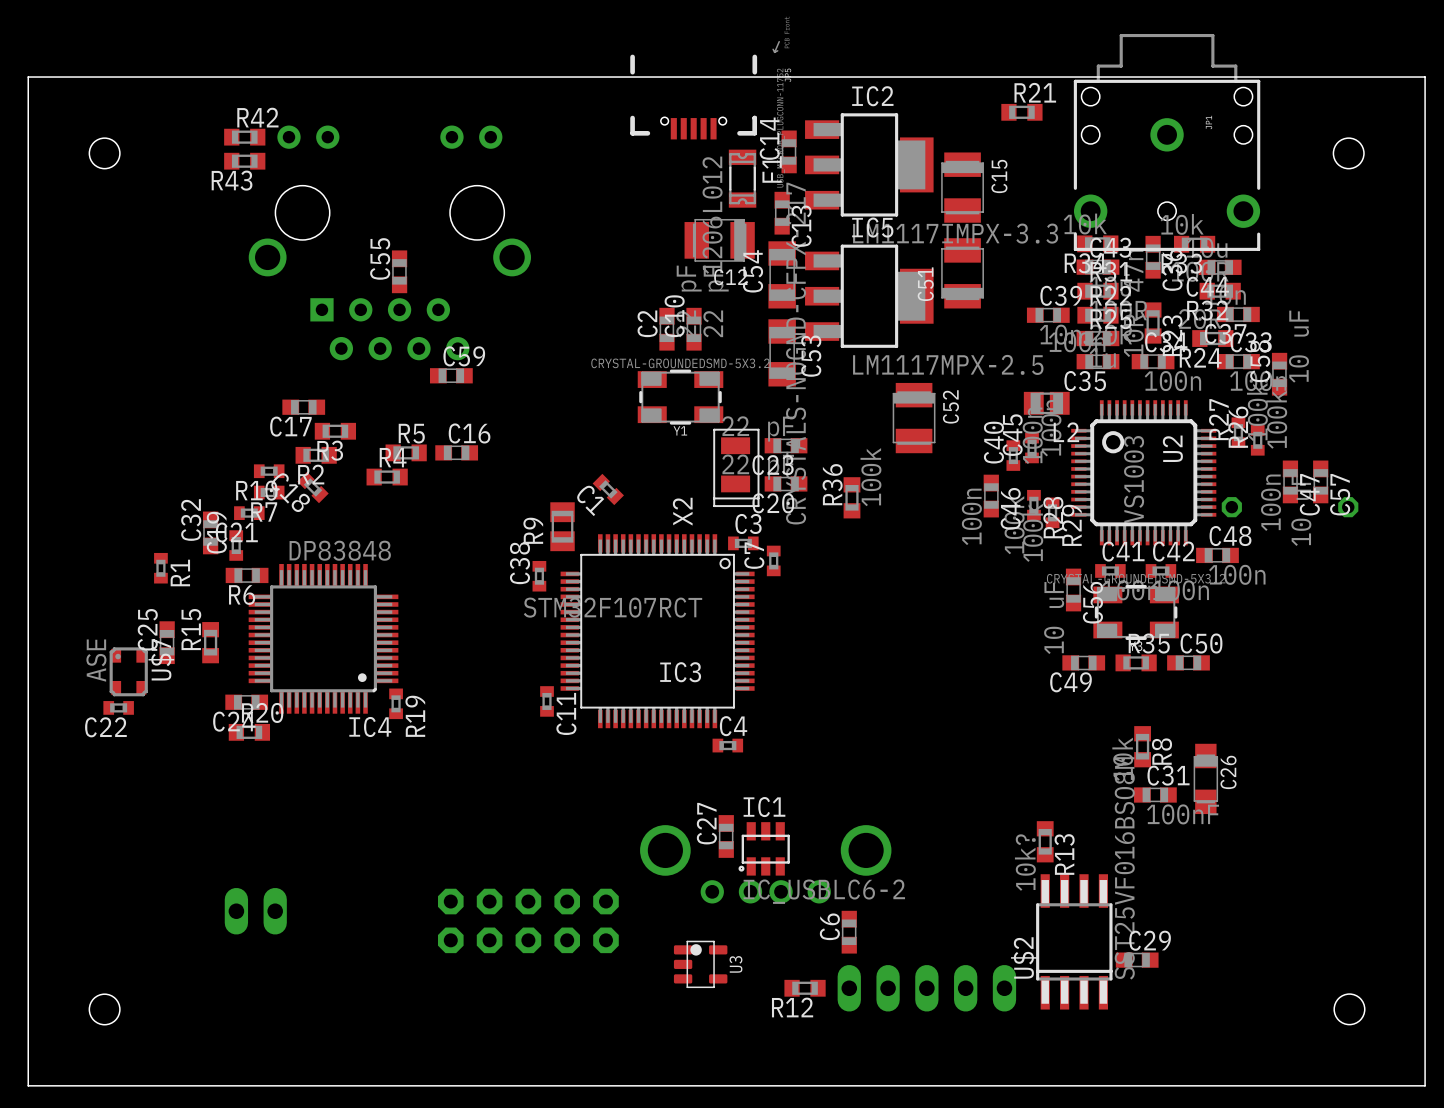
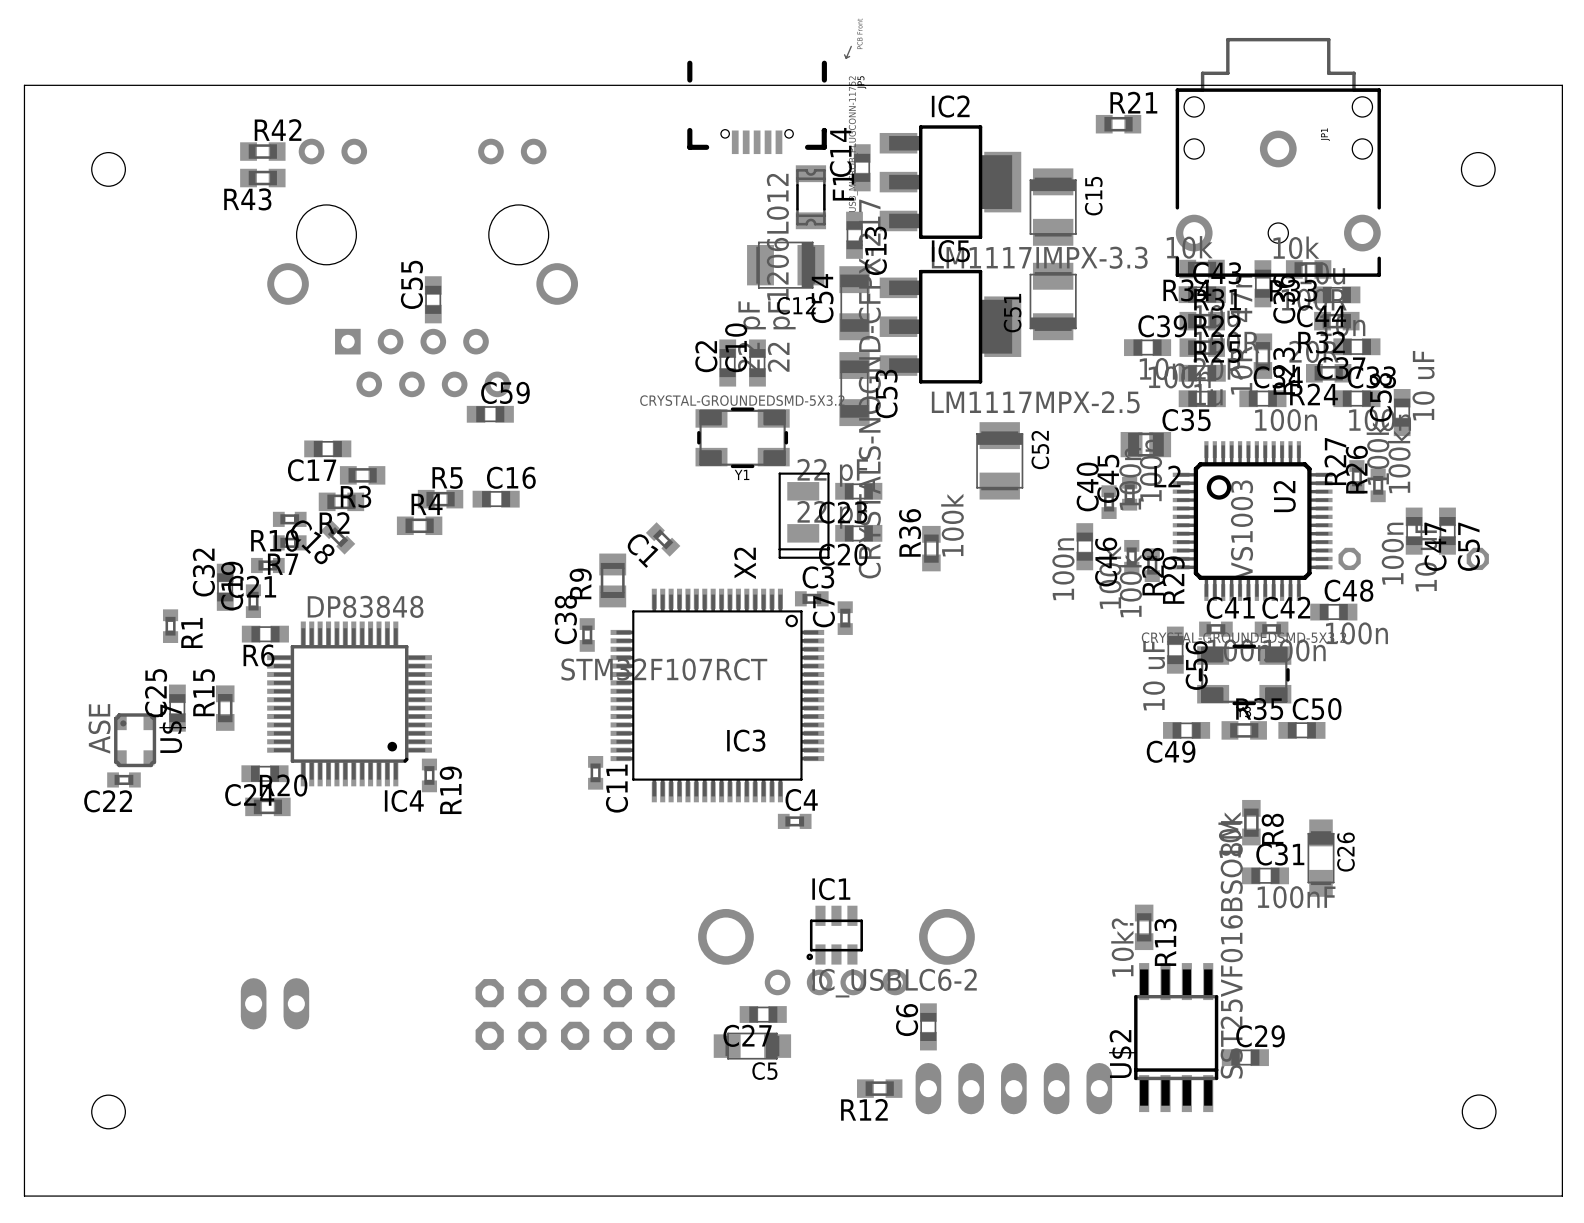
C27 name position: C27 (706, 823) -> C27 (747, 1035)
C27 rotation: 0° (726, 836) -> 90° clockwise (763, 1014)
C27 position: (726, 836) -> (763, 1014)
C5: none -> (752, 1046)
U3: (700, 964) -> none

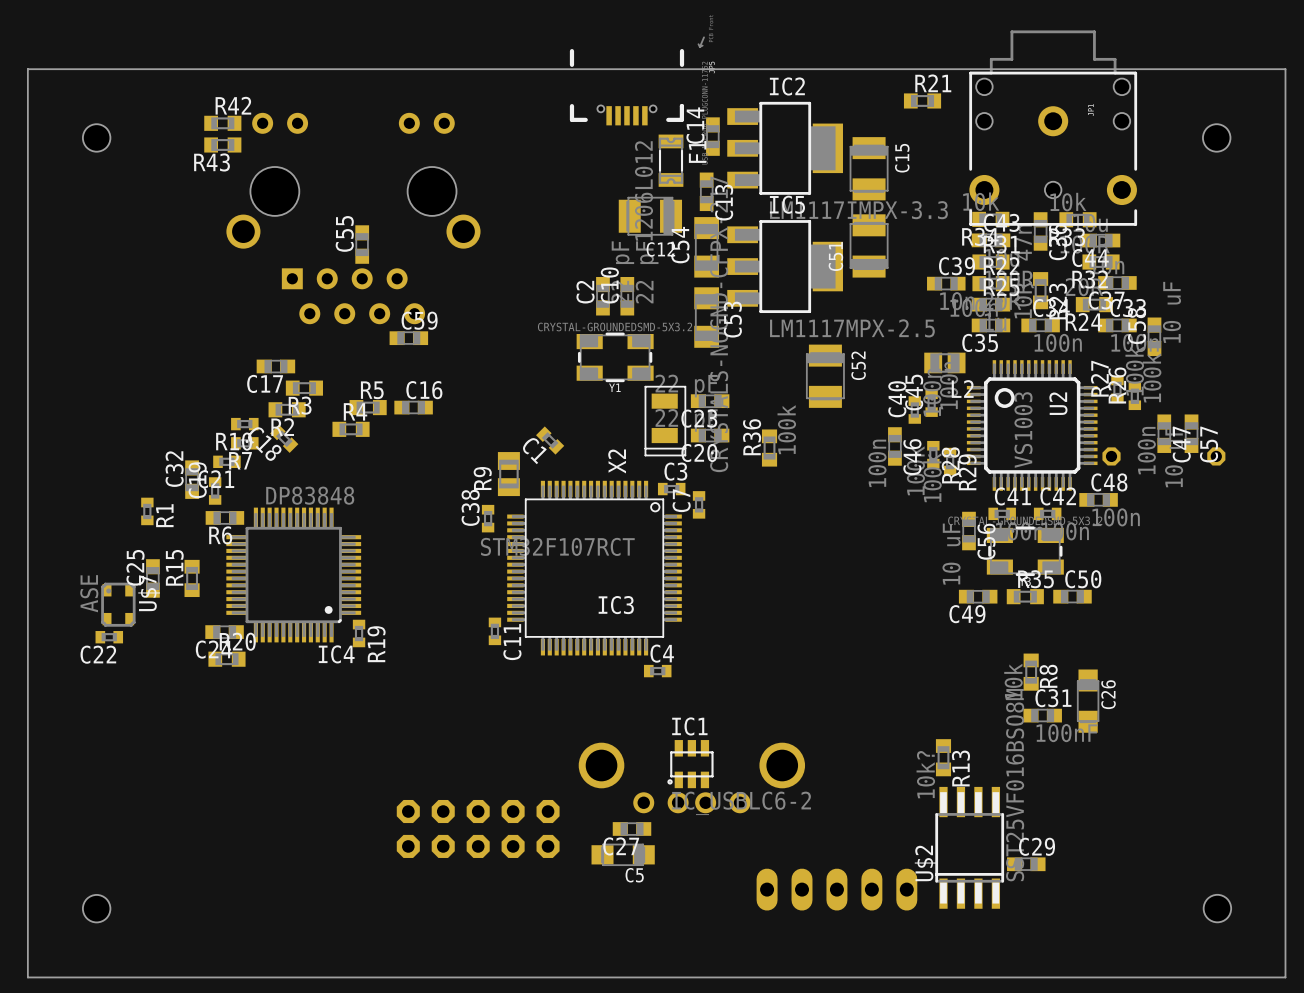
part: (274, 1003) -> none
C6: (928, 1026) -> none
R12: (879, 1088) -> none

